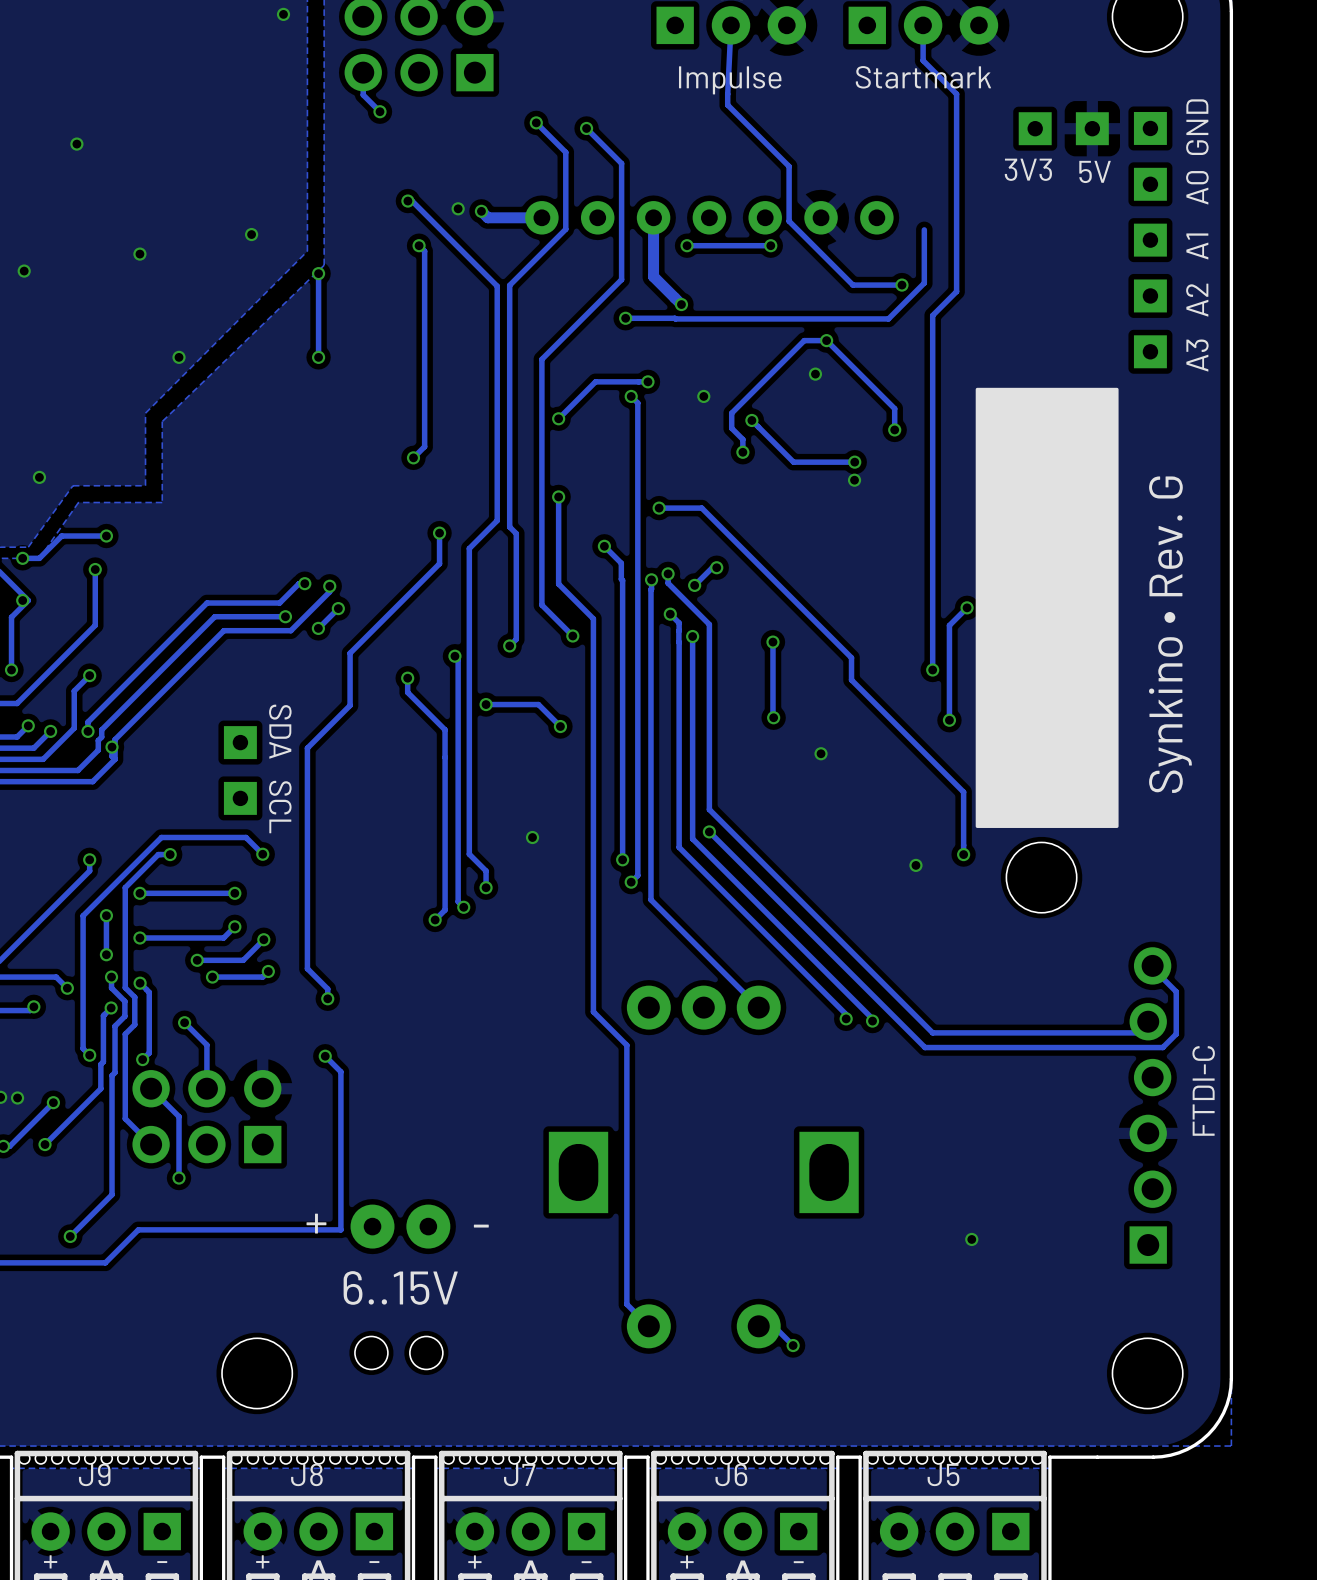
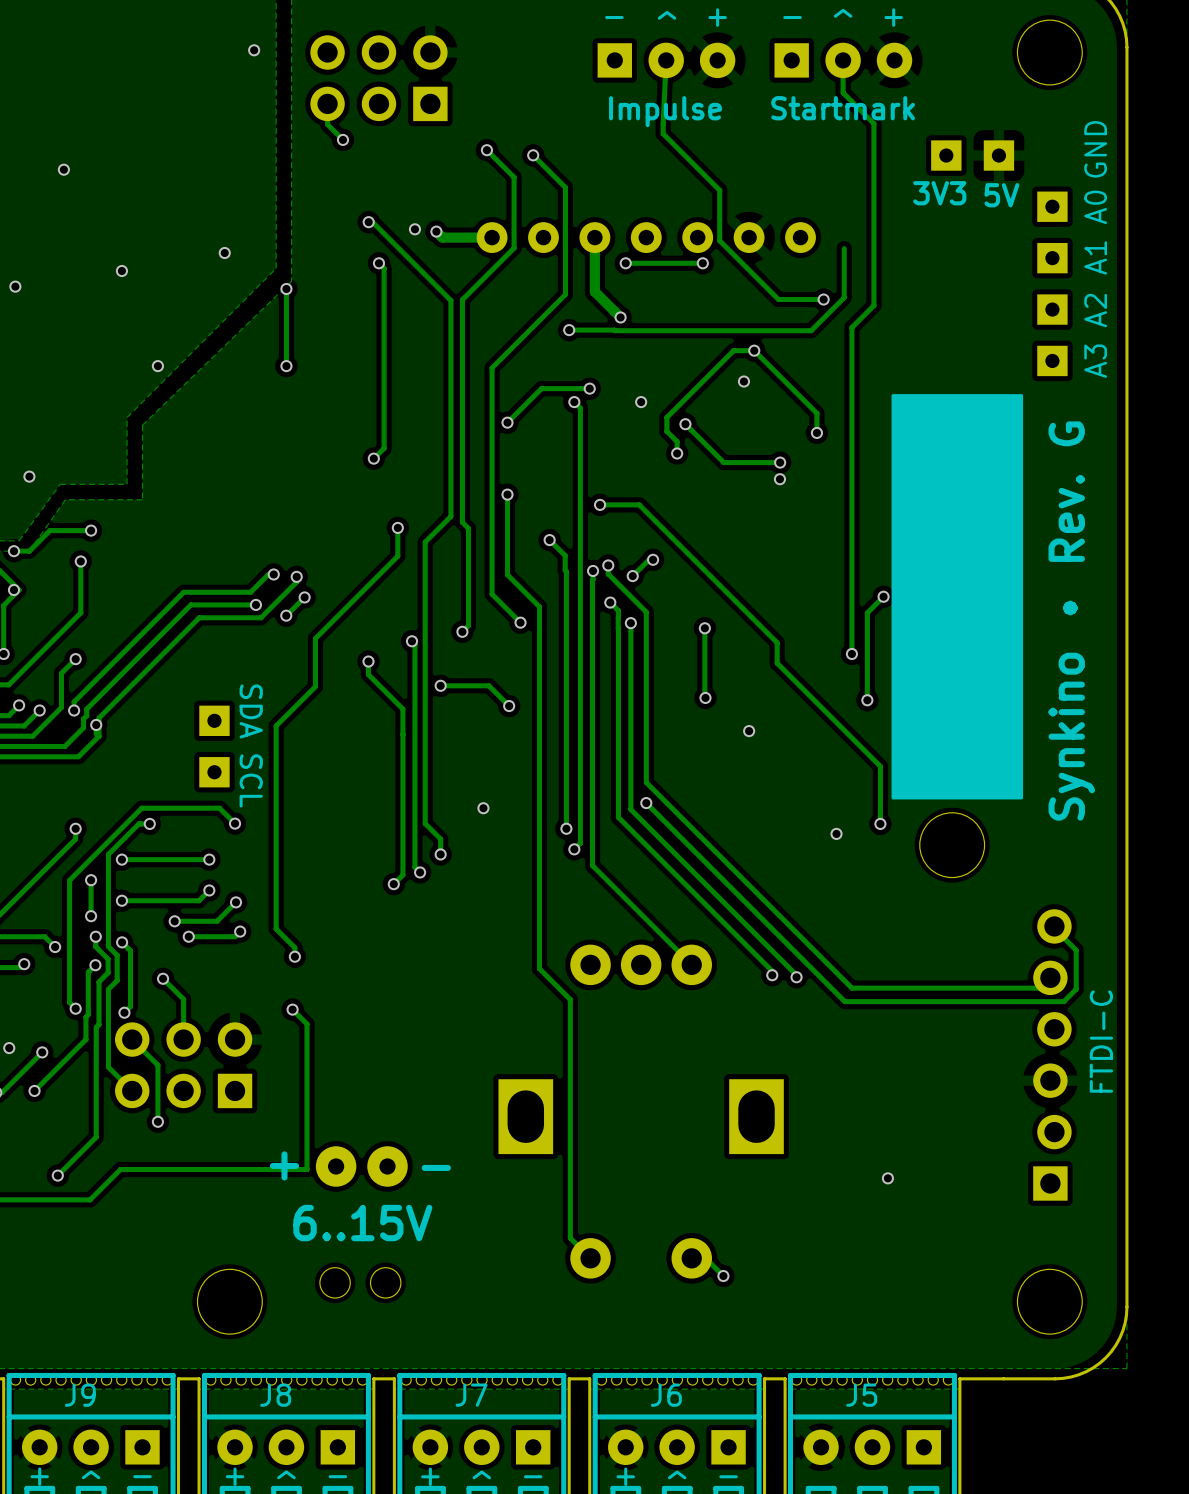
part: (1150, 128) -> none

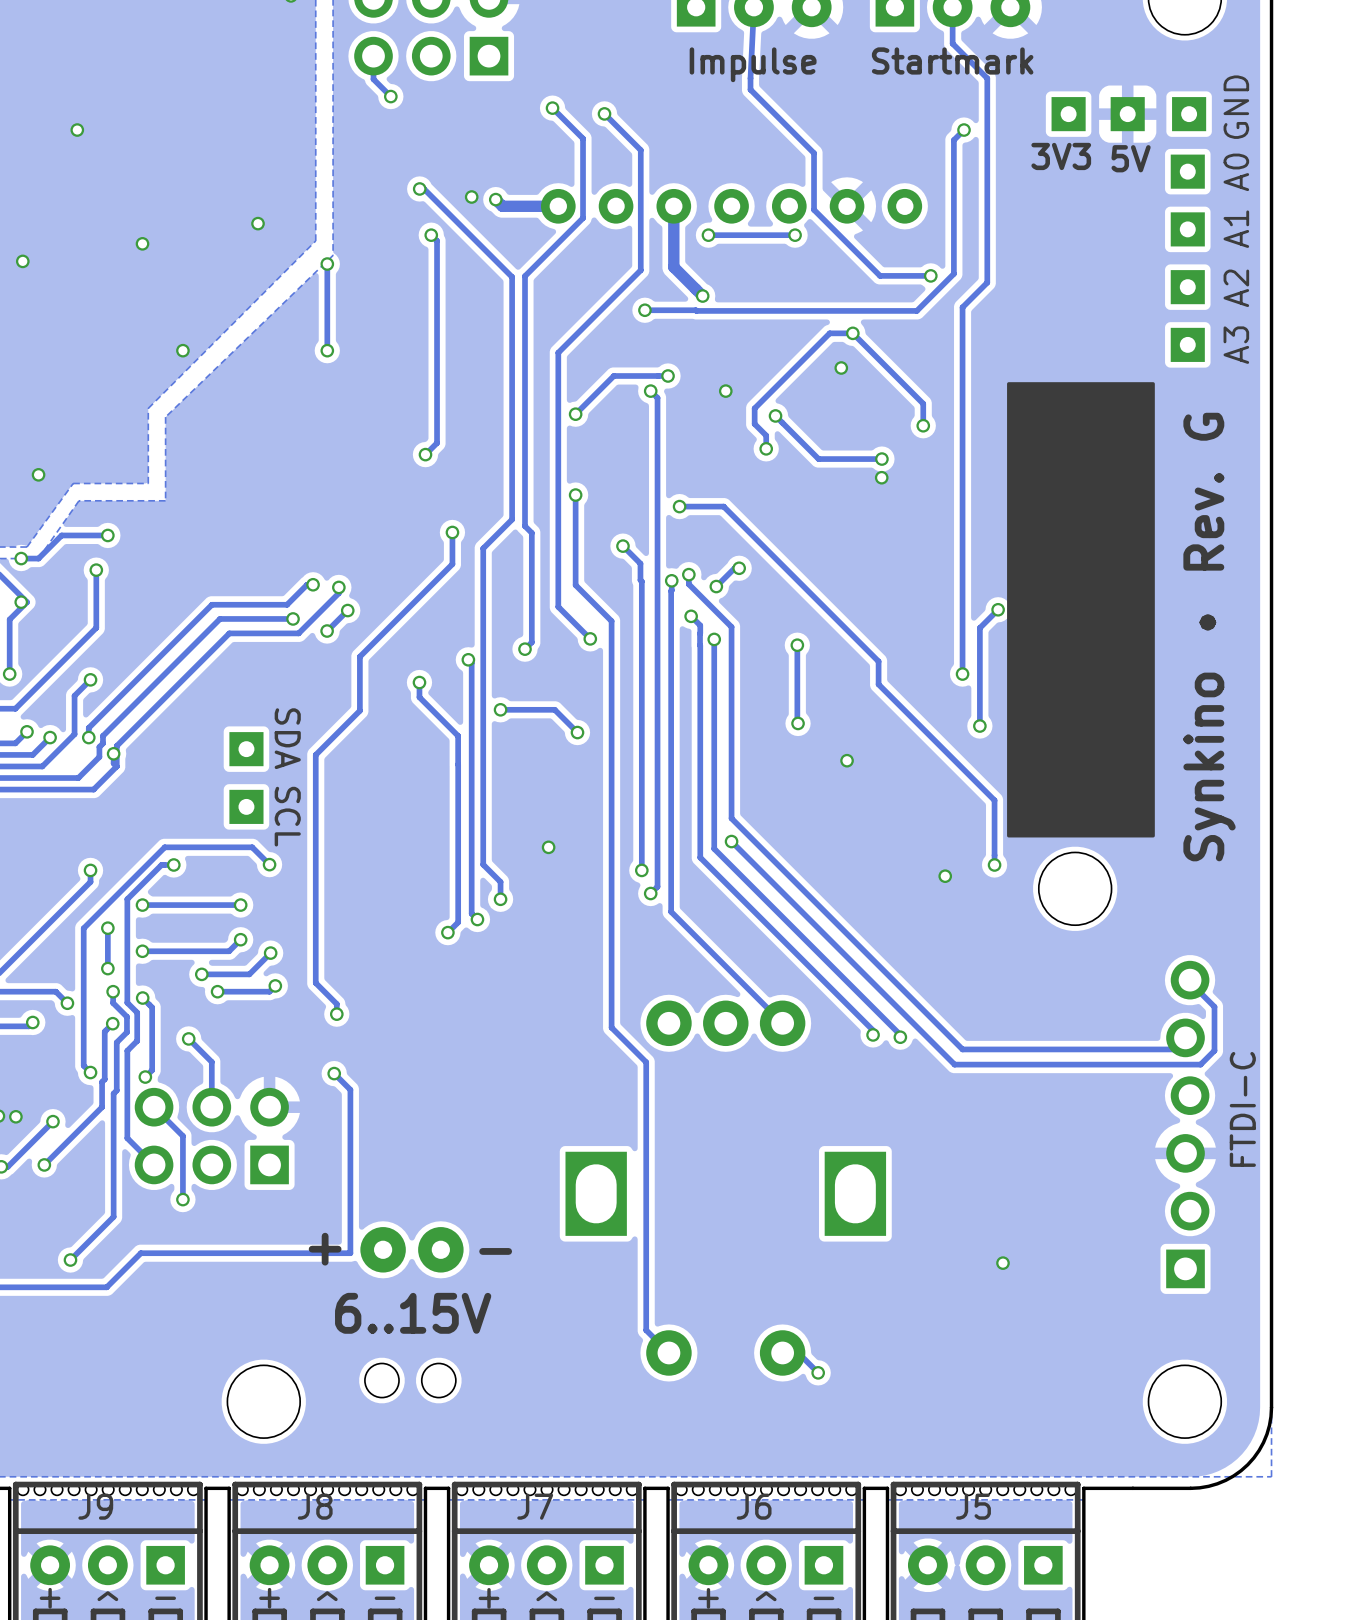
part: none -> (1189, 114)
track: none -> (964, 130) (953, 140) (953, 218)
via: none -> (964, 130)

